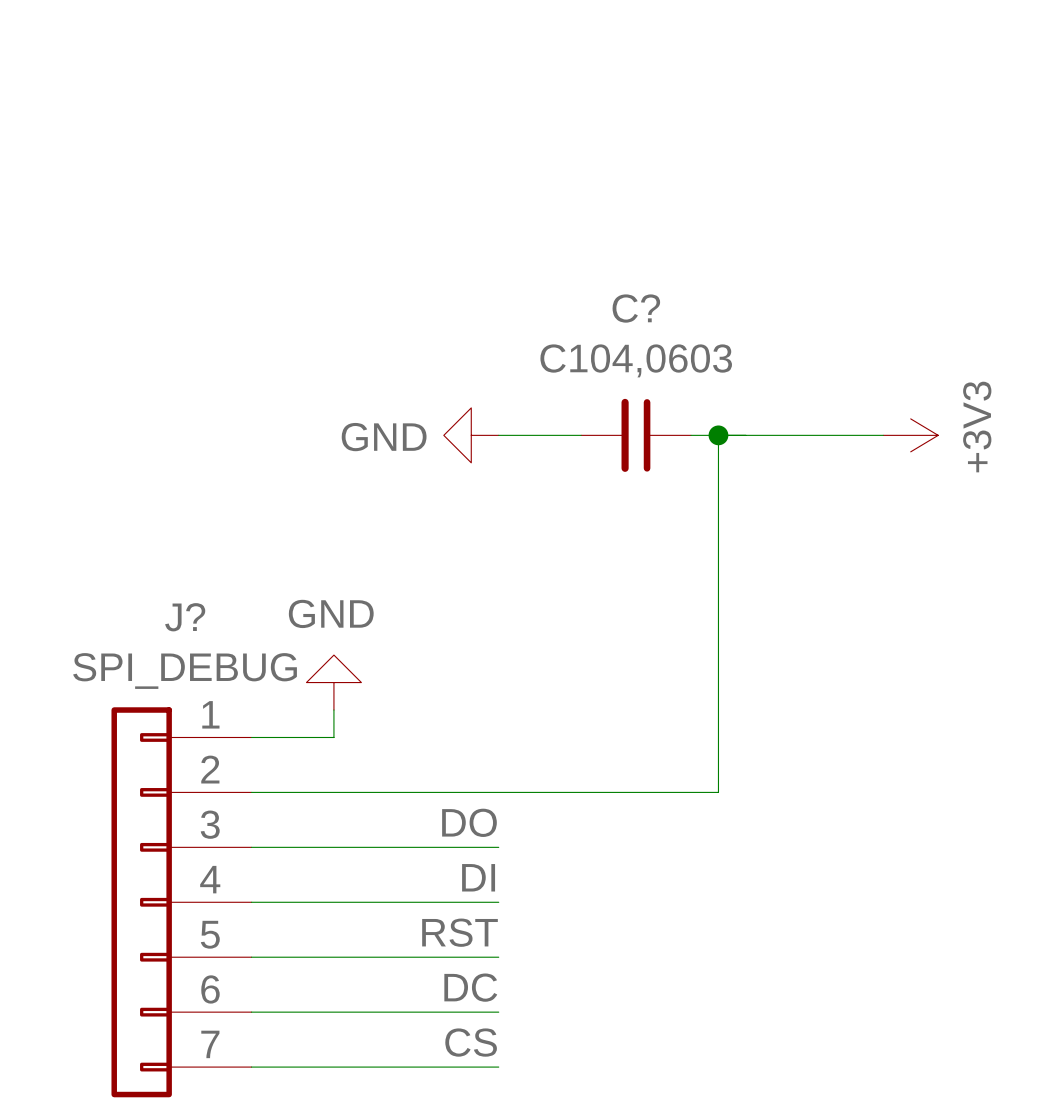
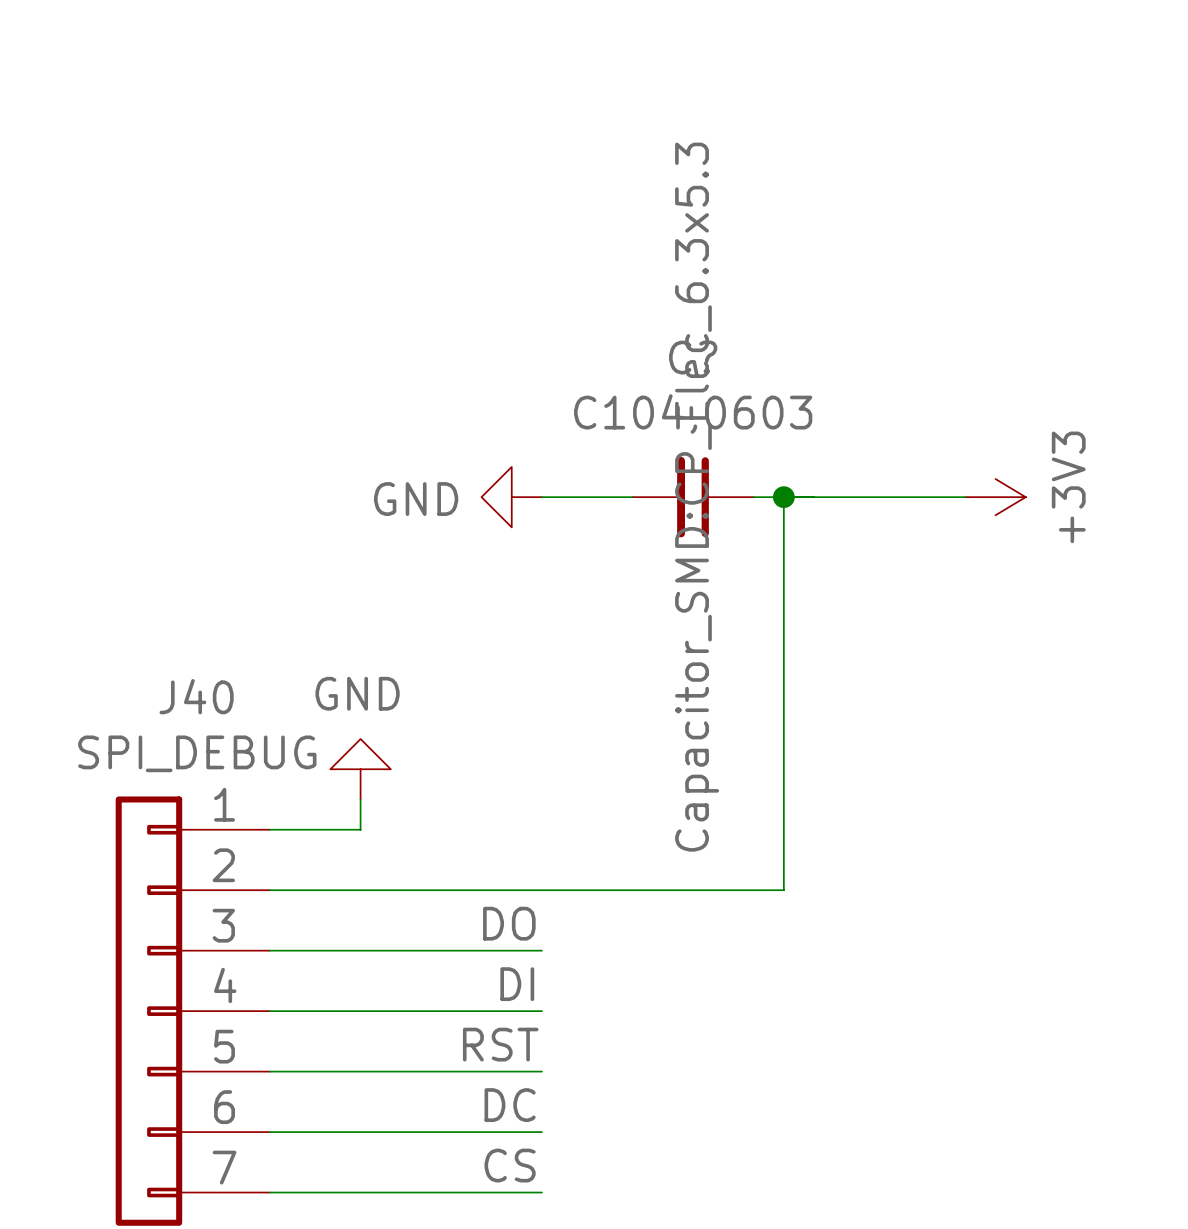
C? text: none -> Capacitor_SMD:CP_Elec_6.3x5.3 (697, 497)
J? name: J? (185, 617) -> J40 (196, 696)

